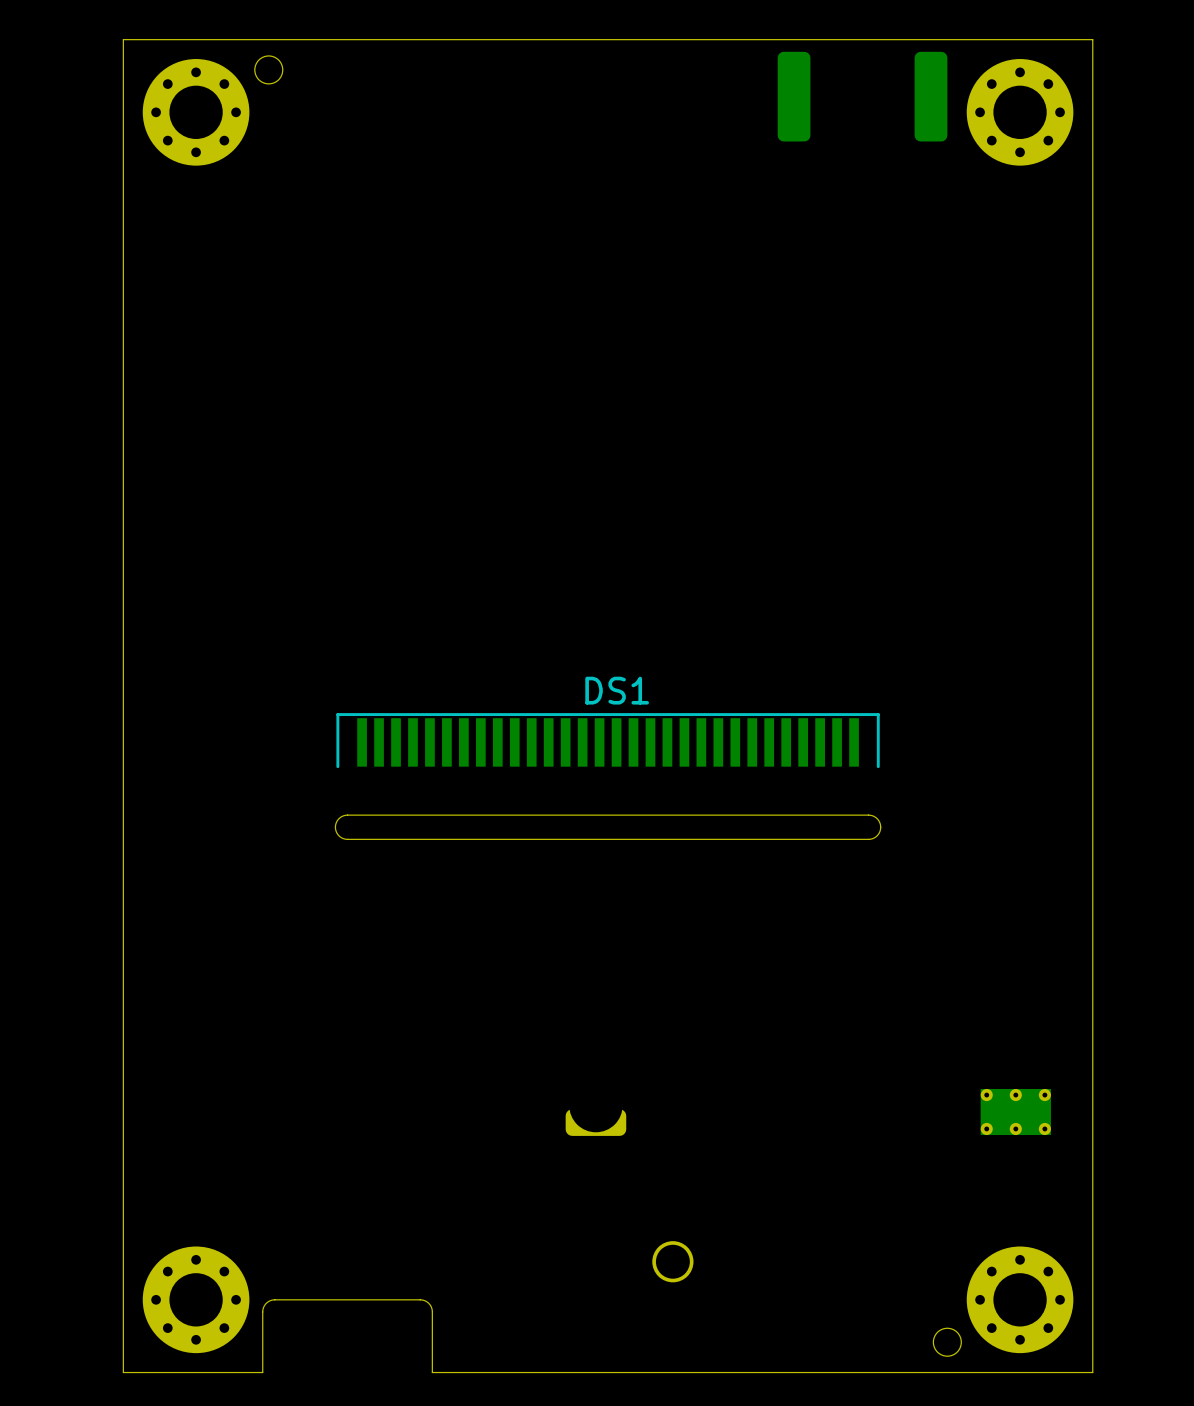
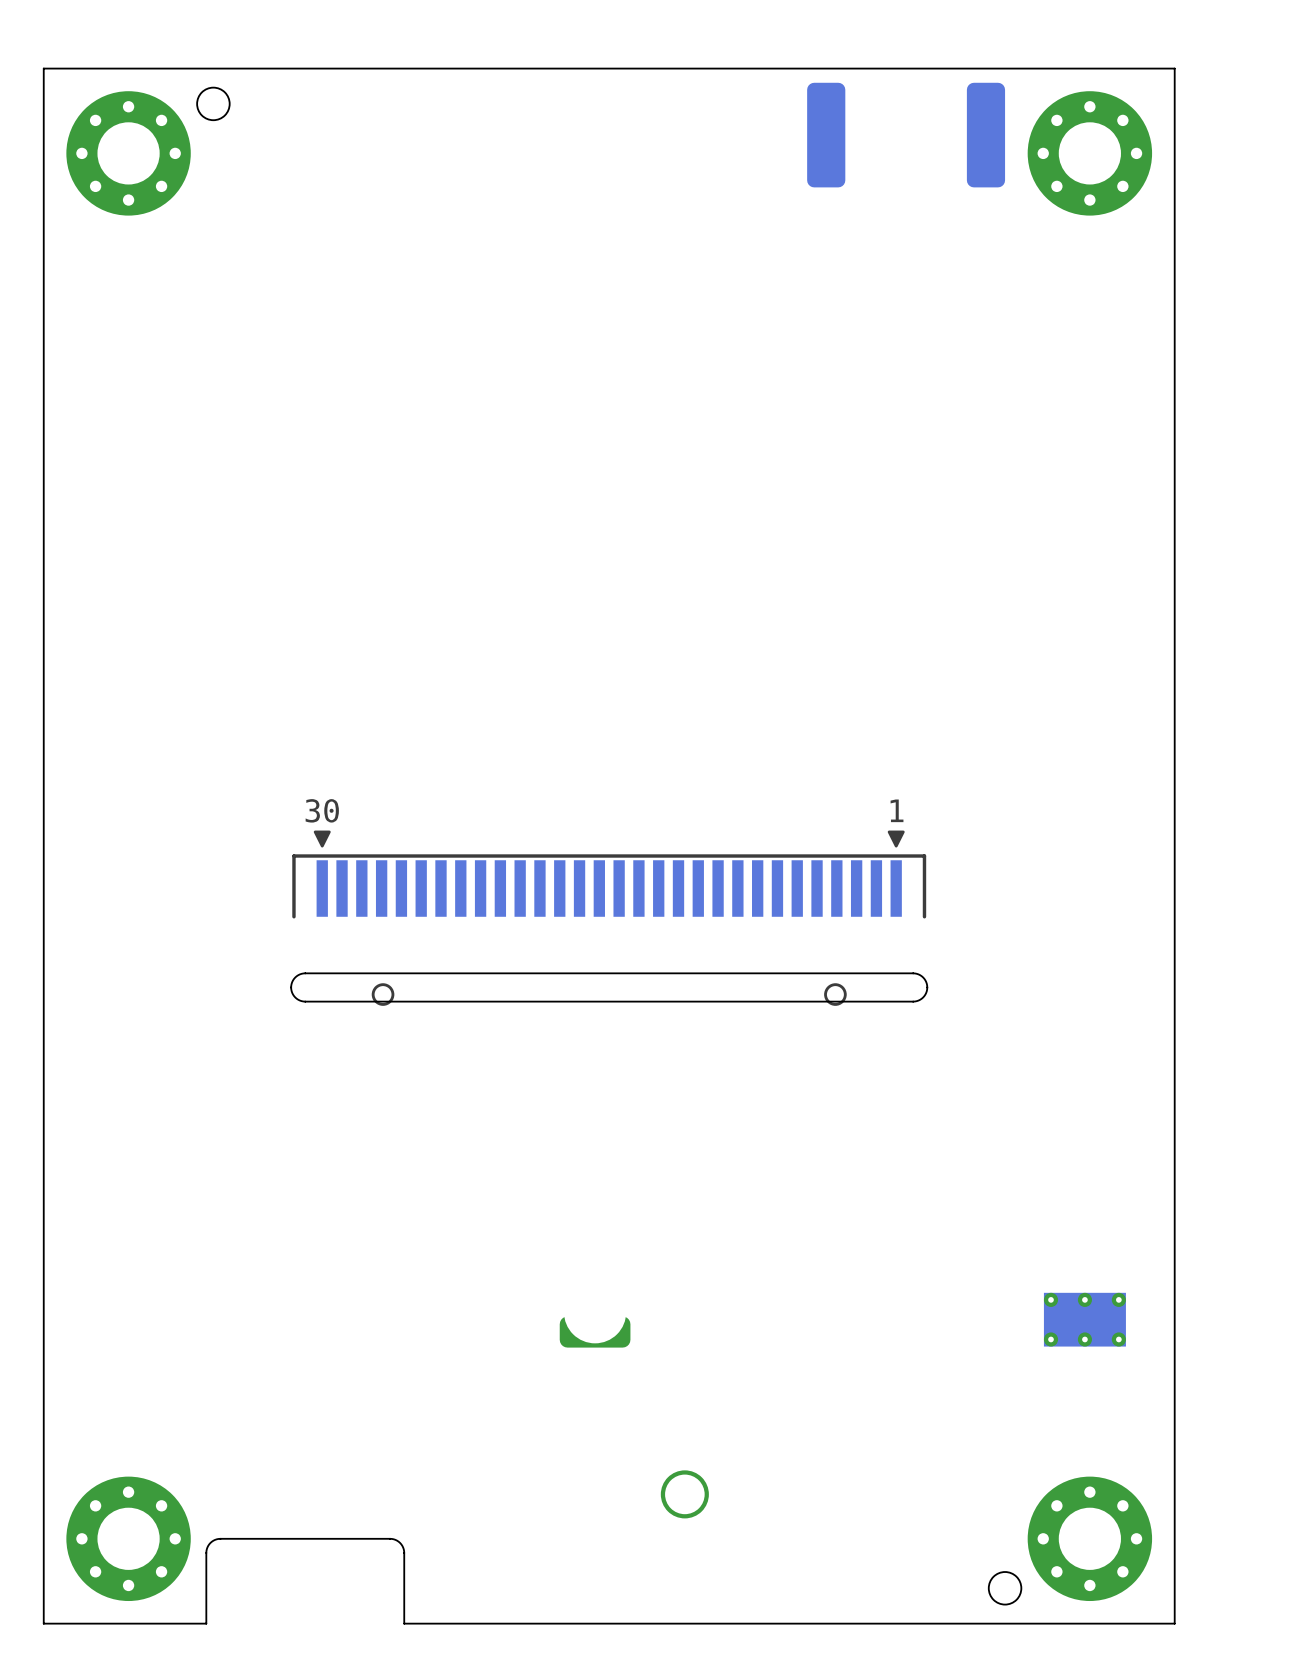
text: none -> 30 (322, 810)
text: none -> 1 (897, 810)
drawing: none -> [313, 830, 331, 848]
drawing: none -> [887, 830, 905, 848]
DS1: (608, 740) -> none
part: none -> (609, 930)

